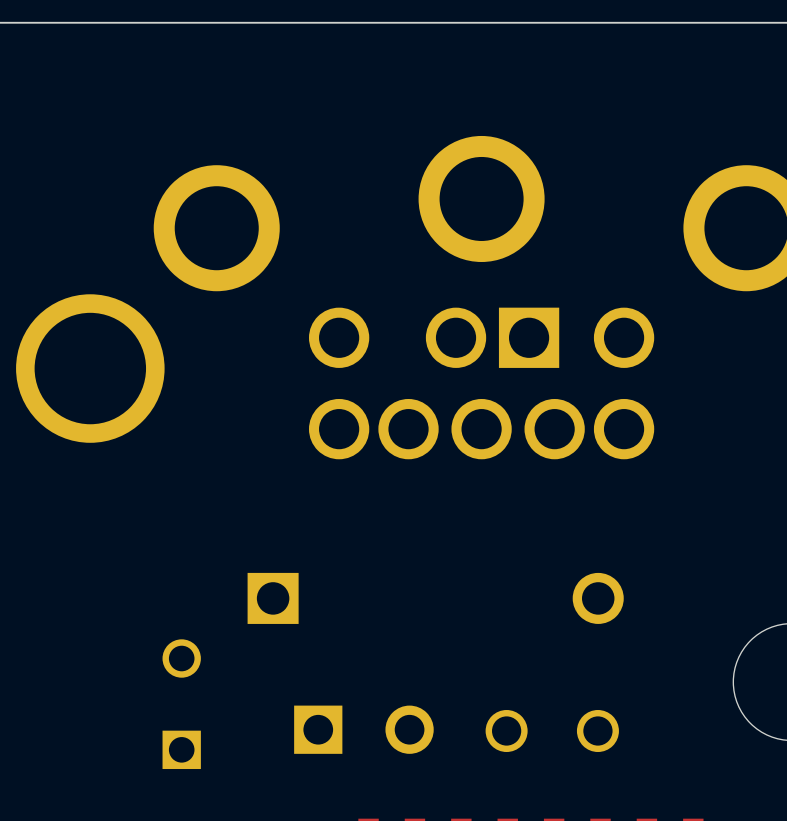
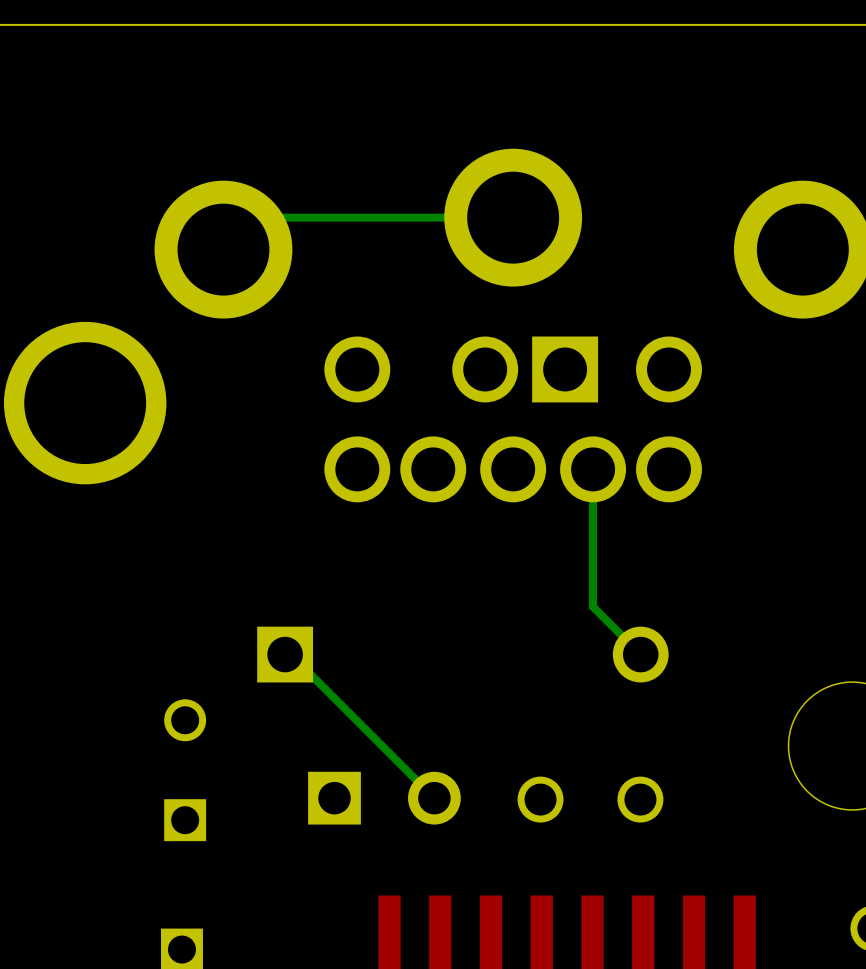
bottom track: none -> (513, 217) (255, 217)
bottom track: none -> (593, 469) (593, 606) (640, 654)
bottom track: none -> (290, 654) (434, 798)

